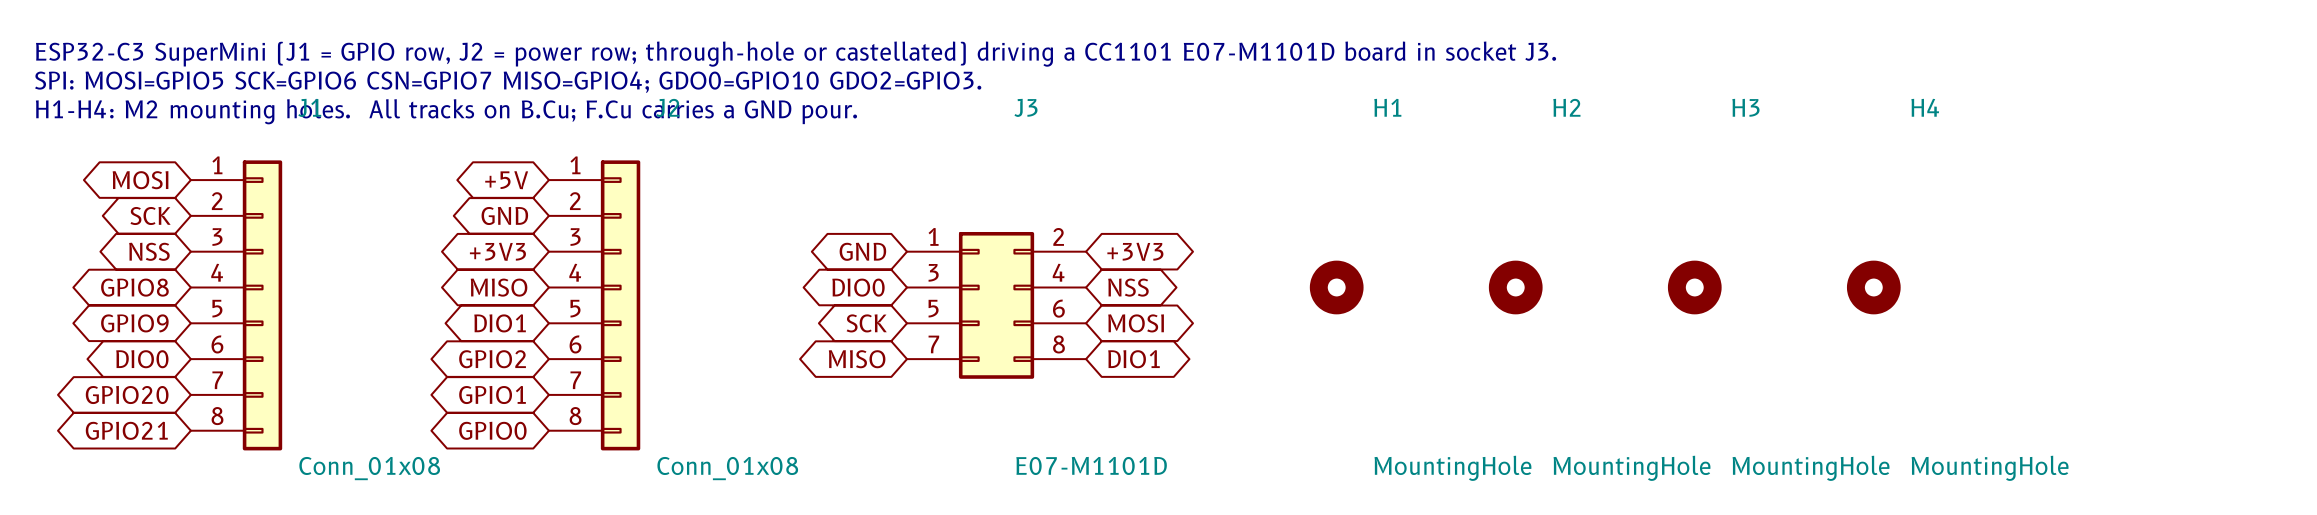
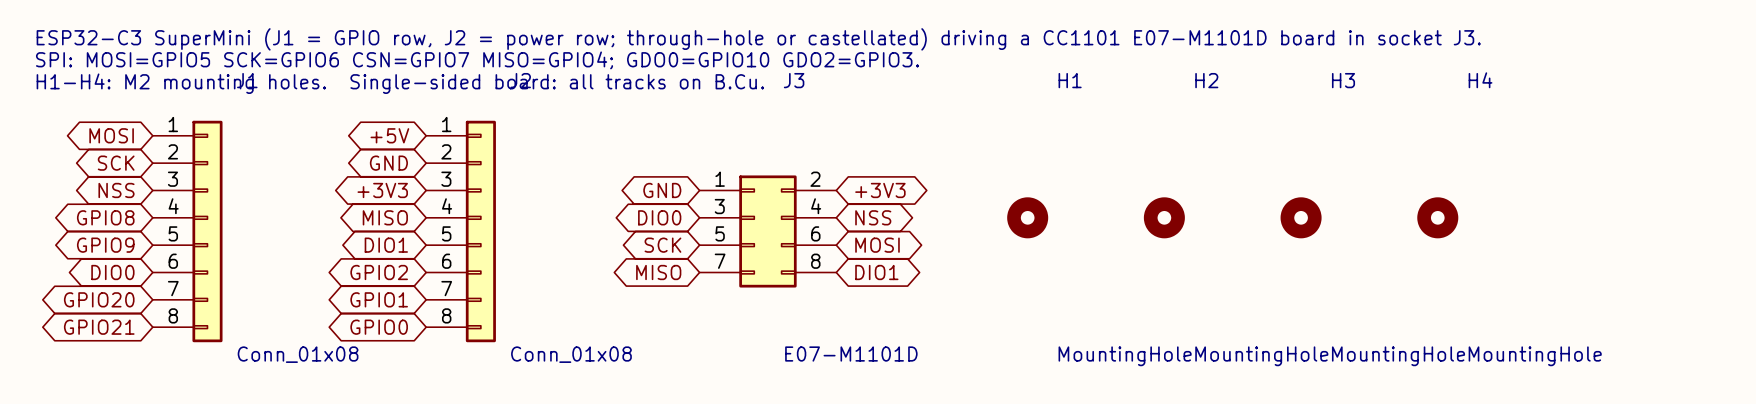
text: H1-H4: M2 mounting holes. All tracks on B.Cu; F.Cu carries a GND pour. (446, 111) -> H1-H4: M2 mounting holes. Single-sided board: all tracks on B.Cu. (400, 83)

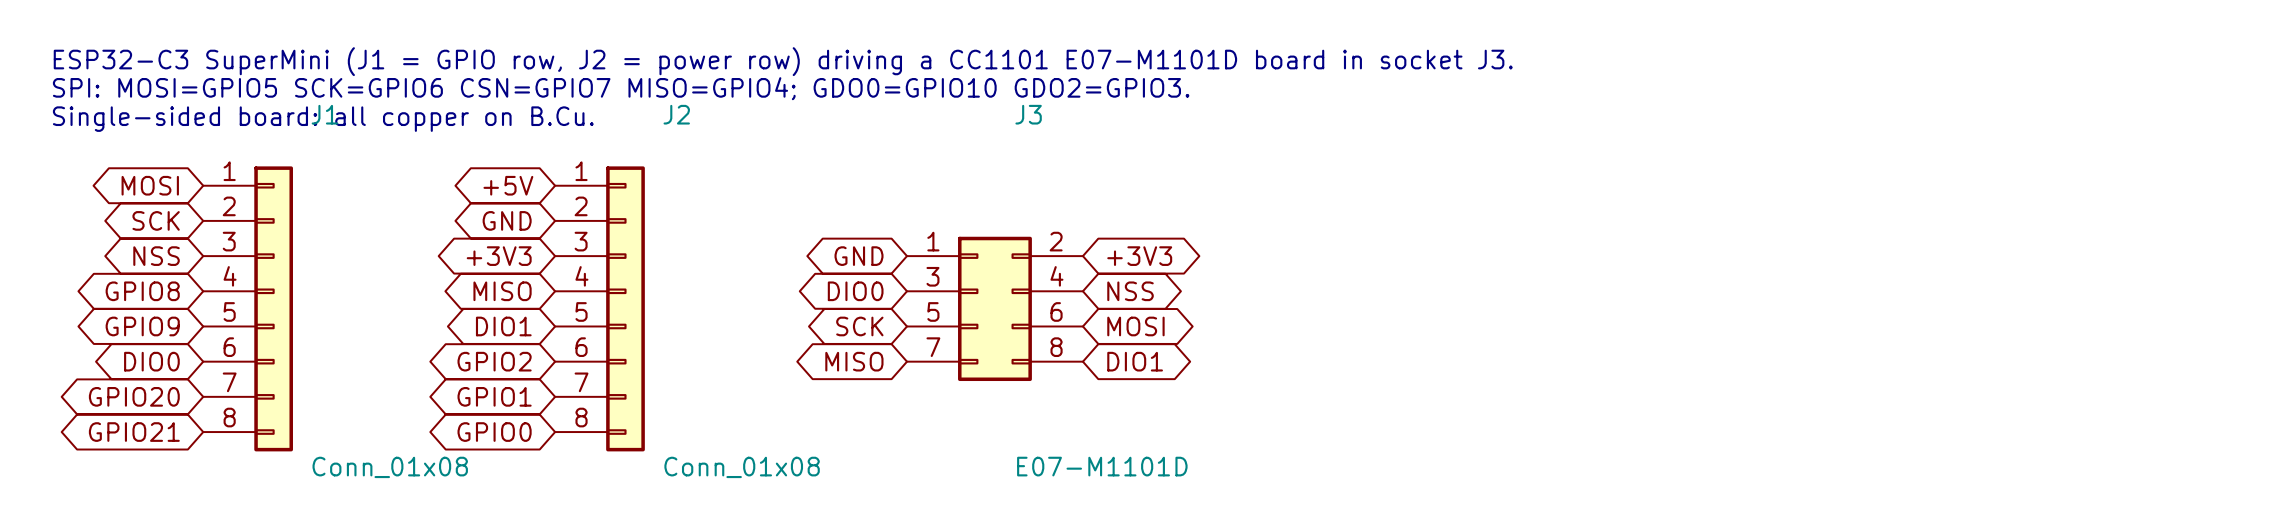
text: ESP32-C3 SuperMini (J1 = GPIO row, J2 = power row; through-hole or castellated) driving a CC1101 E07-M1101D board in socket J3. (758, 39) -> ESP32-C3 SuperMini (J1 = GPIO row, J2 = power row) driving a CC1101 E07-M1101D board in socket J3. (783, 61)
text: H1-H4: M2 mounting holes. Single-sided board: all tracks on B.Cu. (400, 83) -> Single-sided board: all copper on B.Cu. (323, 119)
H1: MountingHole (1027, 217) -> none
H2: MountingHole (1164, 217) -> none
H3: MountingHole (1301, 217) -> none
H4: MountingHole (1437, 217) -> none

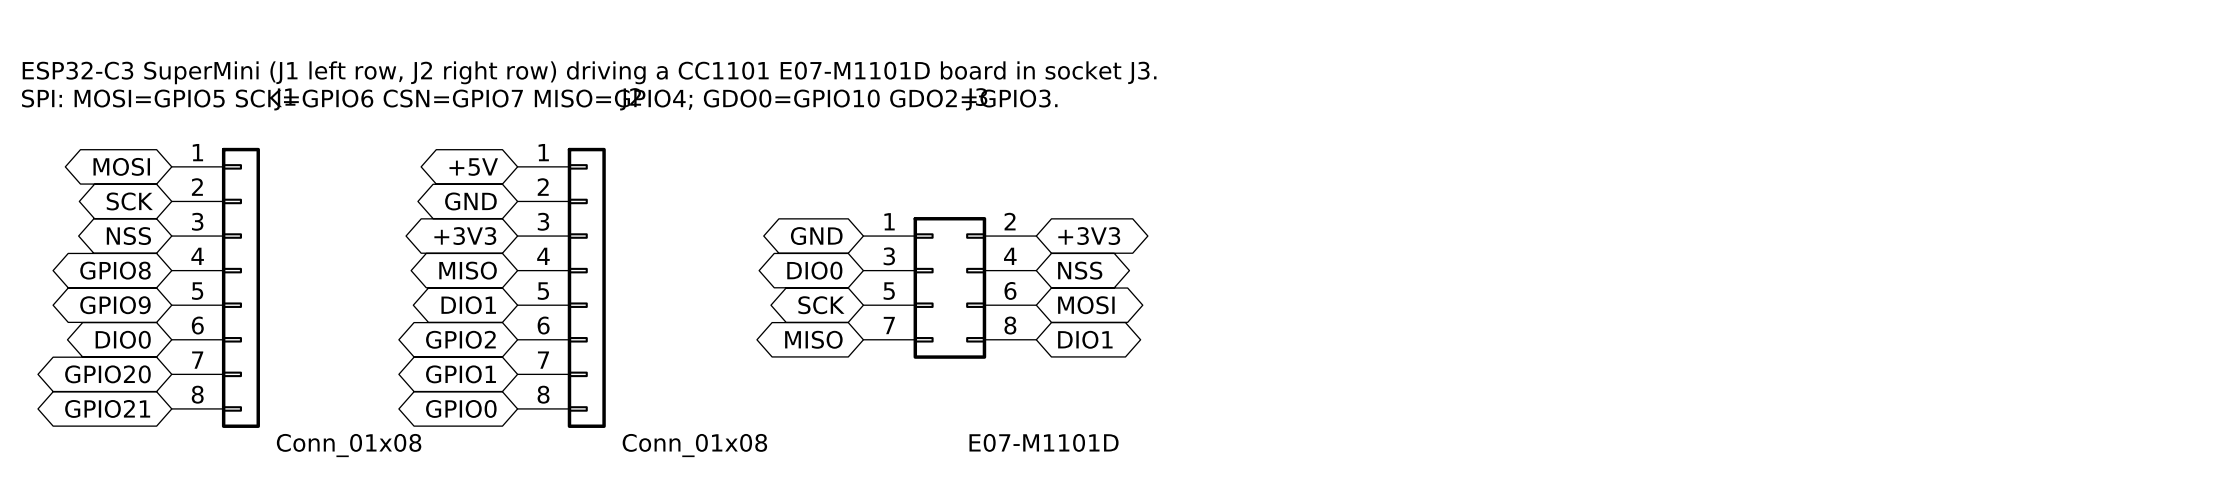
text: ESP32-C3 SuperMini (J1 = GPIO row, J2 = power row) driving a CC1101 E07-M1101D board in socket J3. (783, 61) -> none
text: SPI: MOSI=GPIO5 SCK=GPIO6 CSN=GPIO7 MISO=GPIO4; GDO0=GPIO10 GDO2=GPIO3. (621, 88) -> ESP32-C3 SuperMini (J1 left row, J2 right row) driving a CC1101 E07-M1101D board in socket J3. (589, 72)
text: Single-sided board: all copper on B.Cu. (323, 119) -> SPI: MOSI=GPIO5 SCK=GPIO6 CSN=GPIO7 MISO=GPIO4; GDO0=GPIO10 GDO2=GPIO3. (539, 99)

